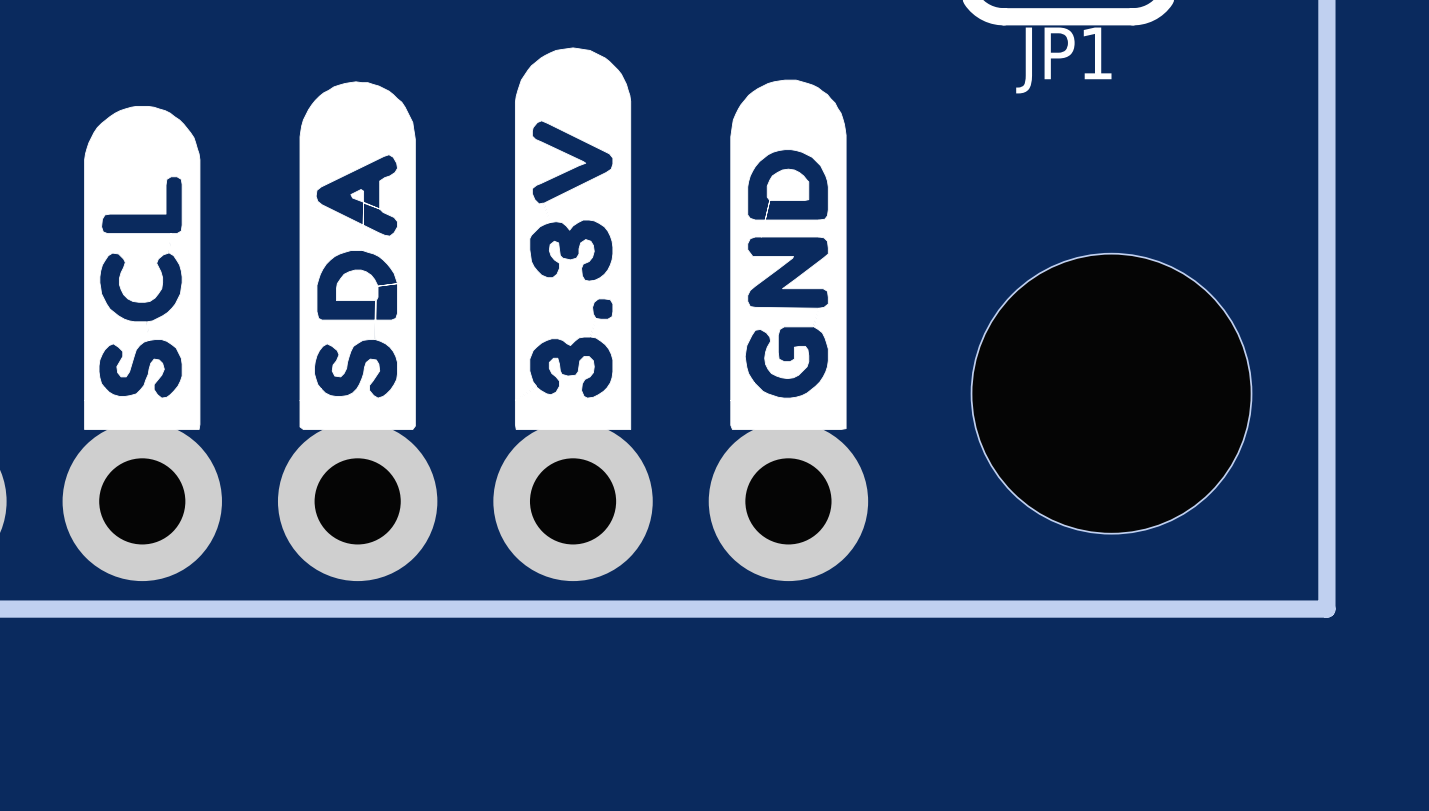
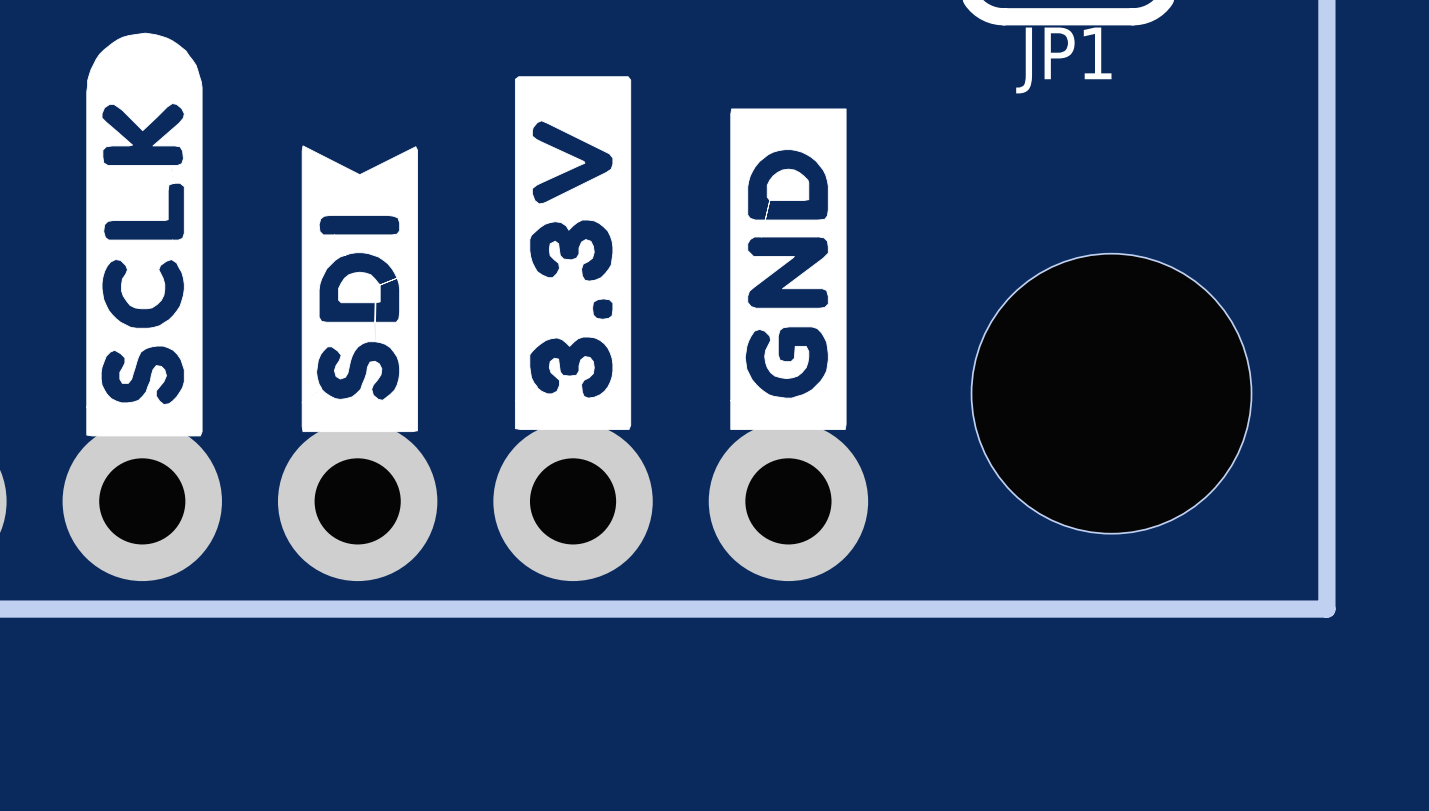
drawing shape: [514, 47, 632, 430] -> [514, 76, 632, 430]
drawing shape: [730, 79, 847, 430] -> [730, 108, 847, 430]
drawing shape: [299, 81, 416, 430] -> [301, 145, 418, 433]
drawing shape: [84, 105, 201, 430] -> [86, 32, 203, 437]

